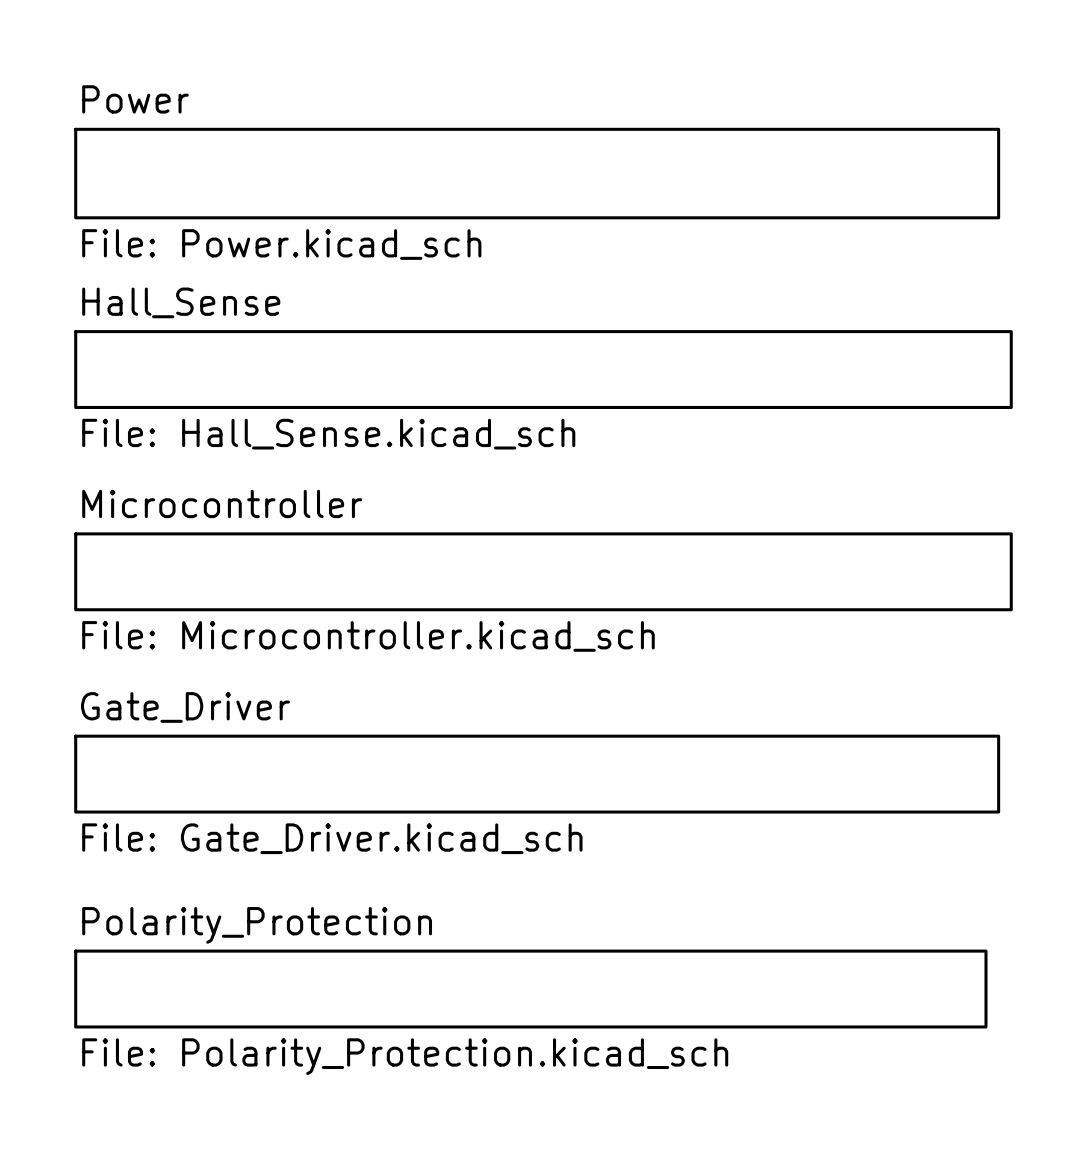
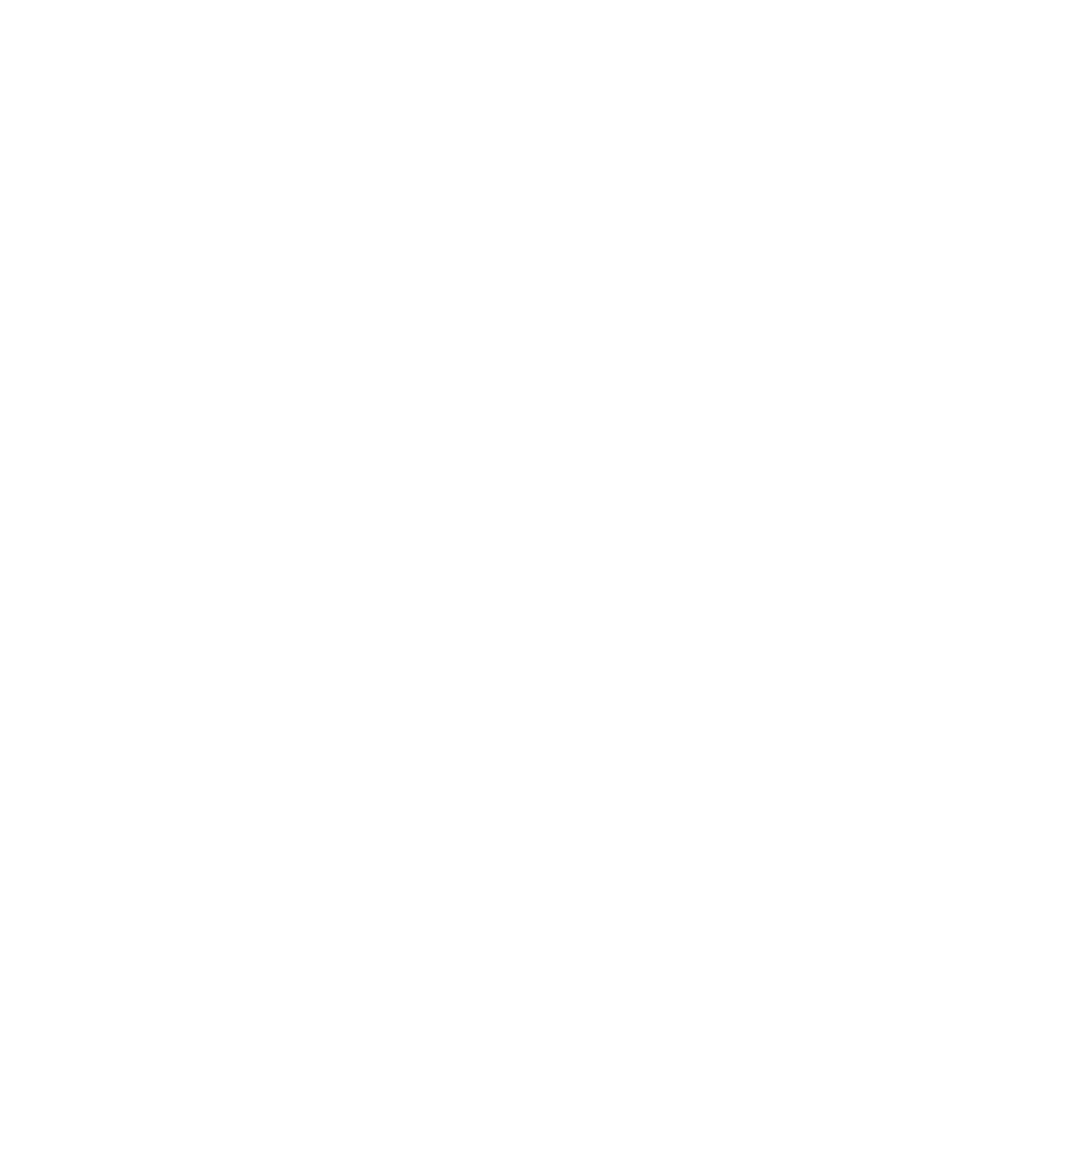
sheet Power: File: Power.kicad_sch (537, 173) -> none
sheet Hall_Sense: File: Hall_Sense.kicad_sch (543, 369) -> none
sheet Microcontroller: File: Microcontroller.kicad_sch (543, 571) -> none
sheet Gate_Driver: File: Gate_Driver.kicad_sch (537, 774) -> none
sheet Polarity_Protection: File: Polarity_Protection.kicad_sch (530, 989) -> none

